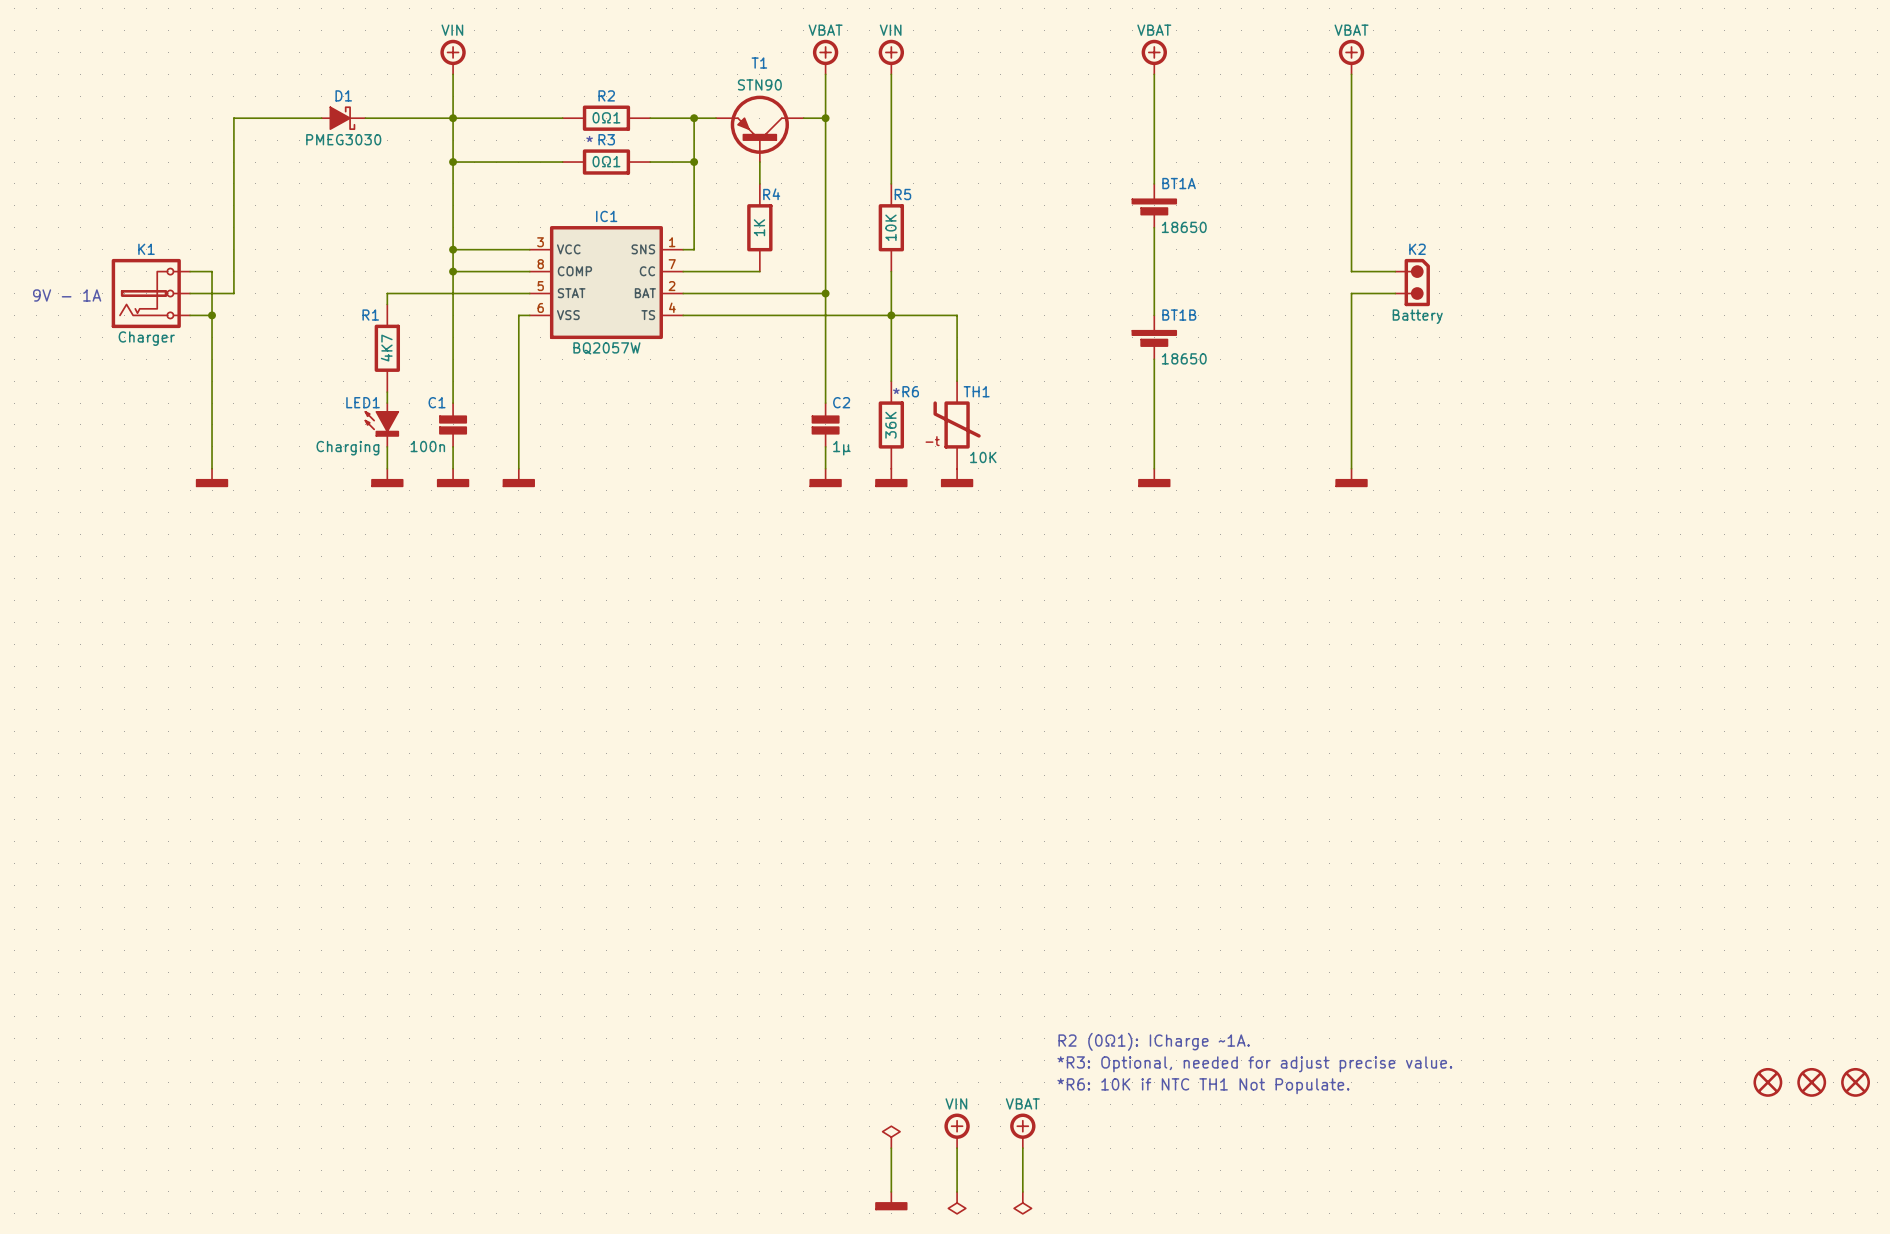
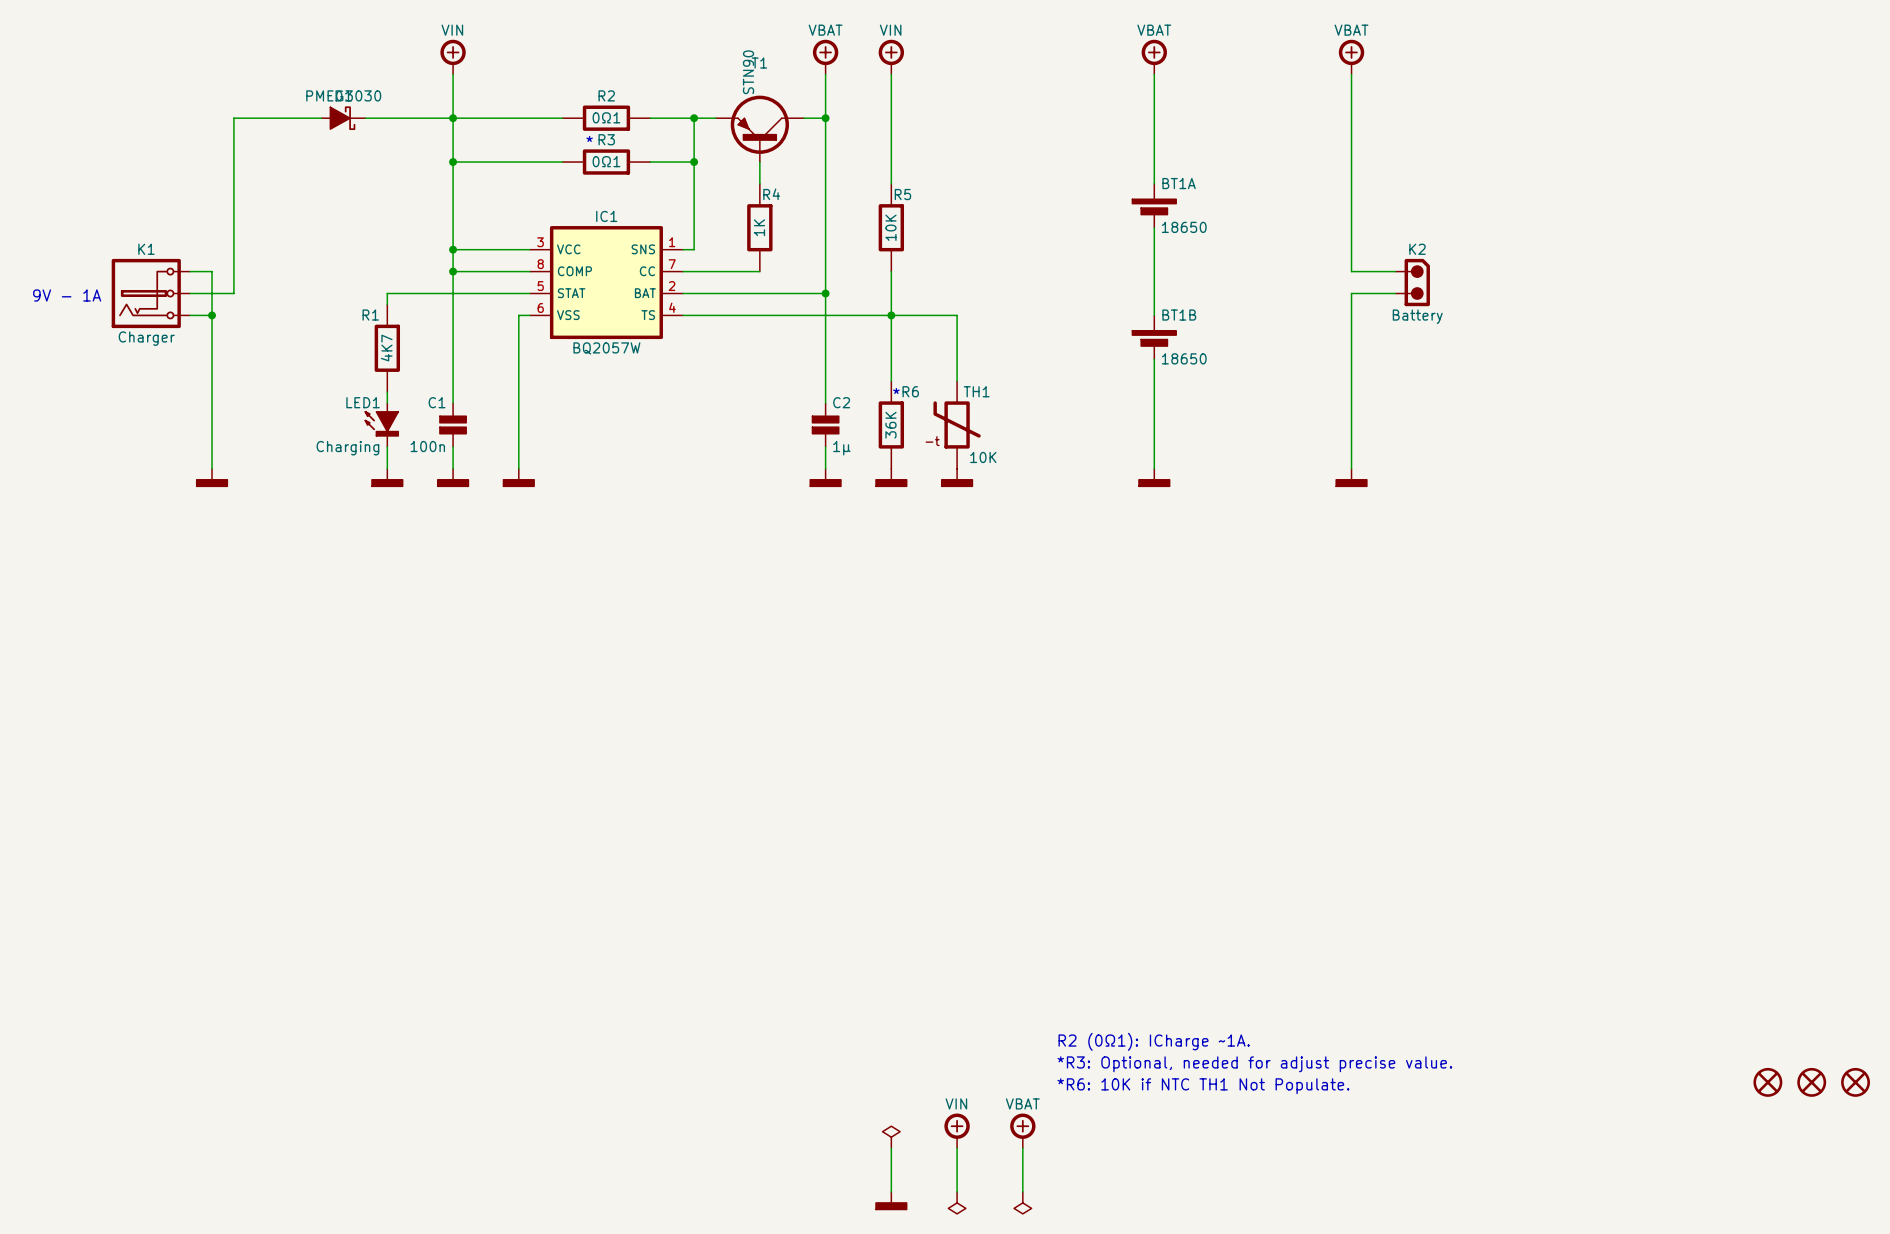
T1 text rotation: 0° (759, 84) -> 90° counterclockwise (748, 72)
D1 text position: PMEG3030 (343, 139) -> PMEG3030 (343, 95)

